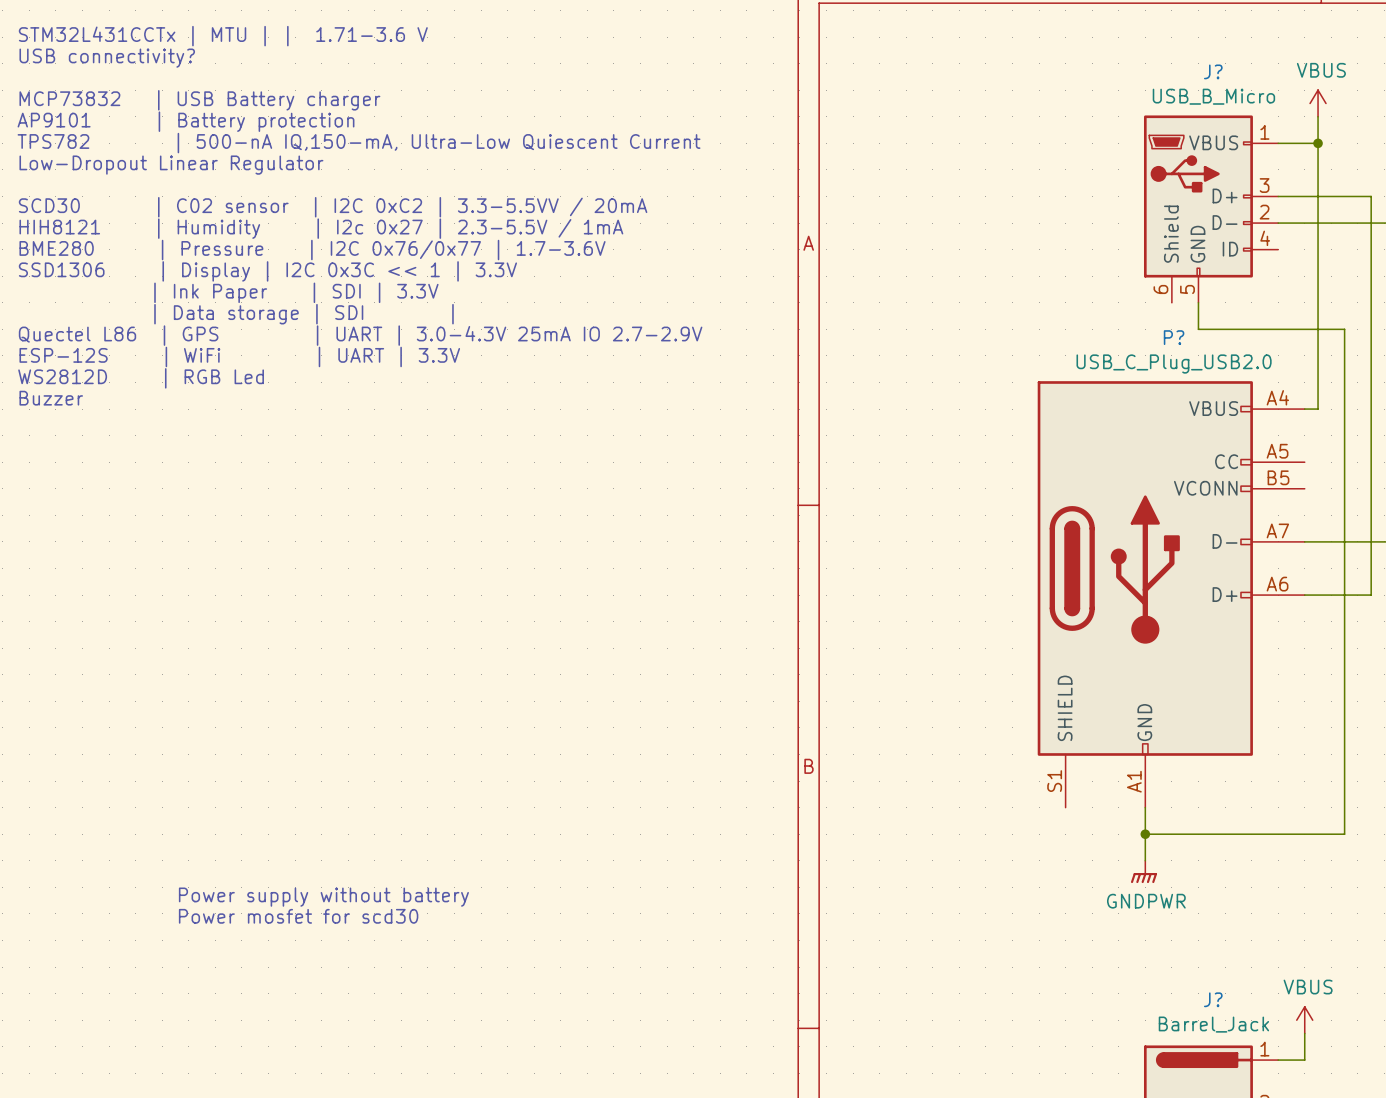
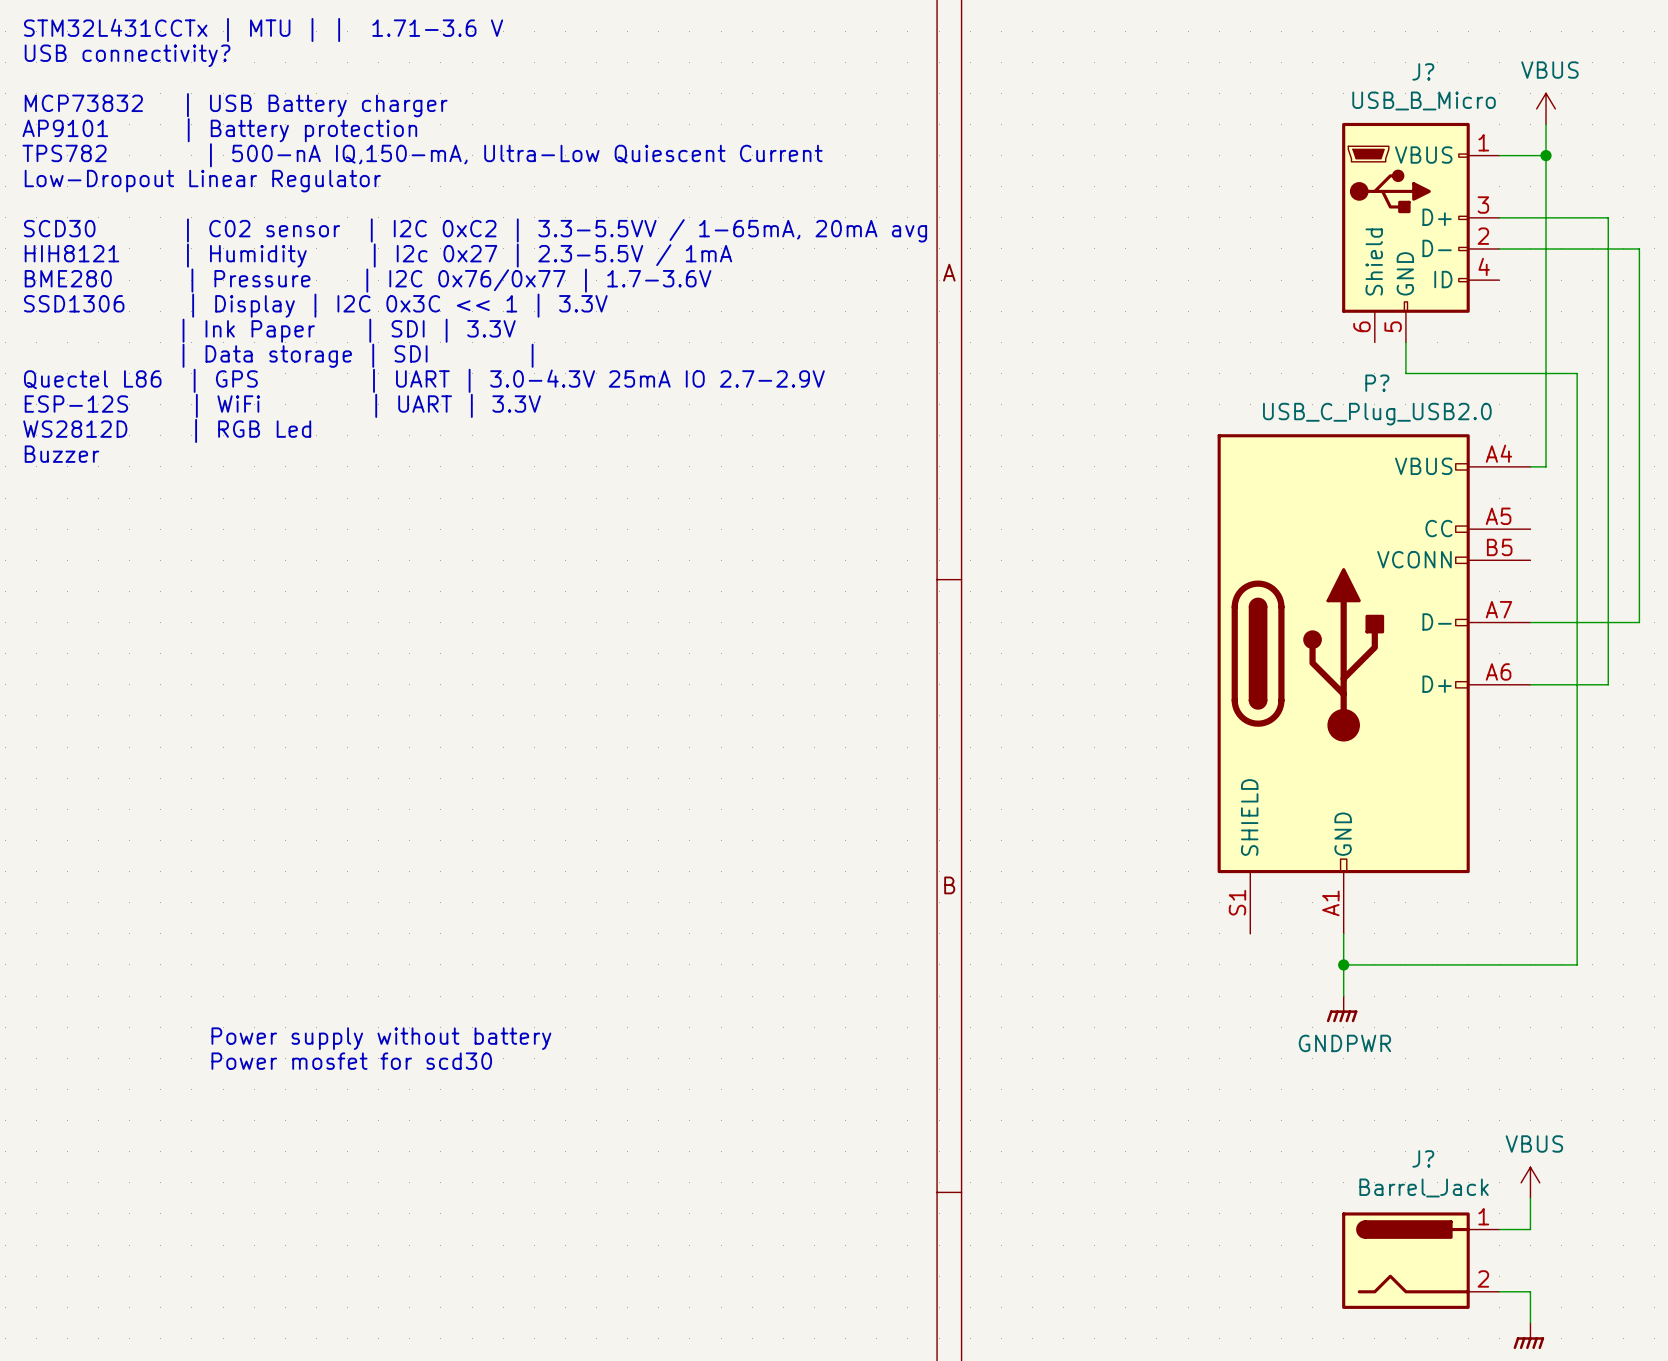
text: SCD30 | C02 sensor | I2C 0xC2 | 3.3-5.5VV / 20mA (333, 207) -> SCD30 | C02 sensor | I2C 0xC2 | 3.3-5.5VV / 1-65mA, 20mA avg (475, 230)

